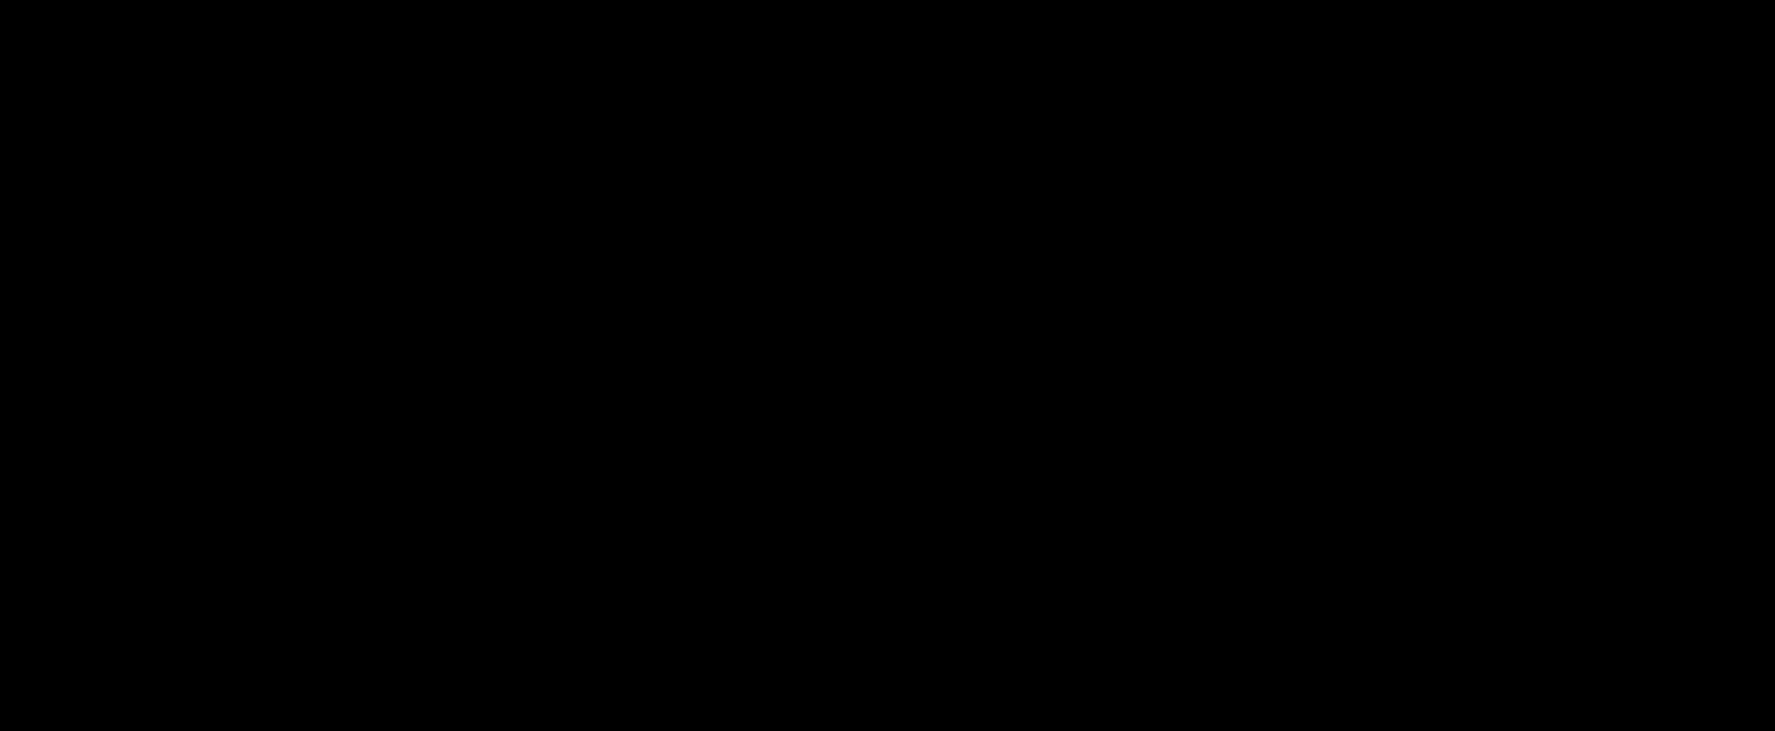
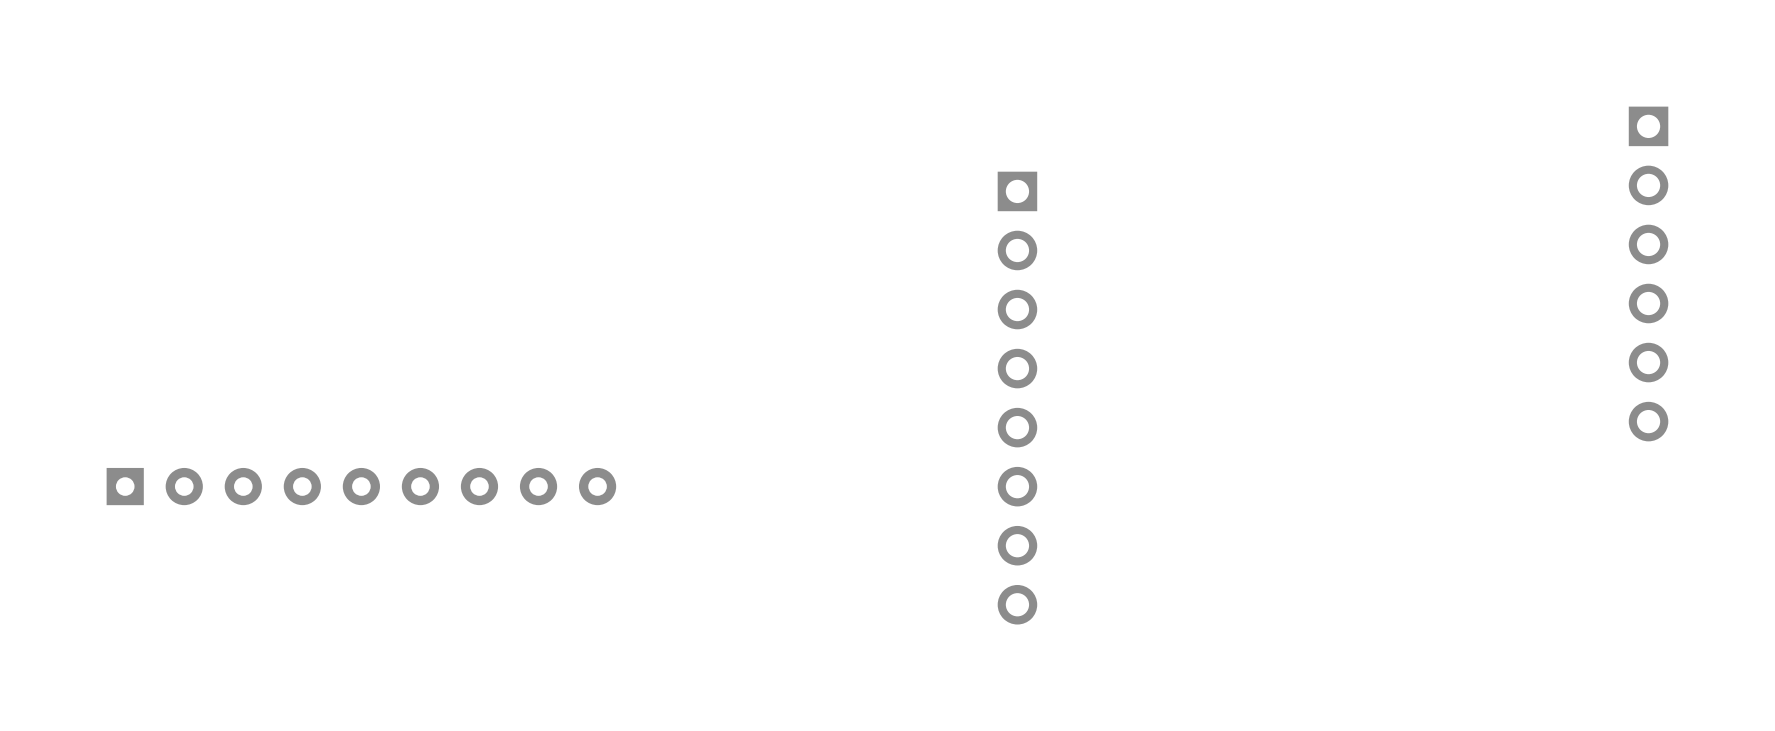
part: none -> (1648, 273)
part: none -> (1017, 398)
part: none -> (361, 486)

